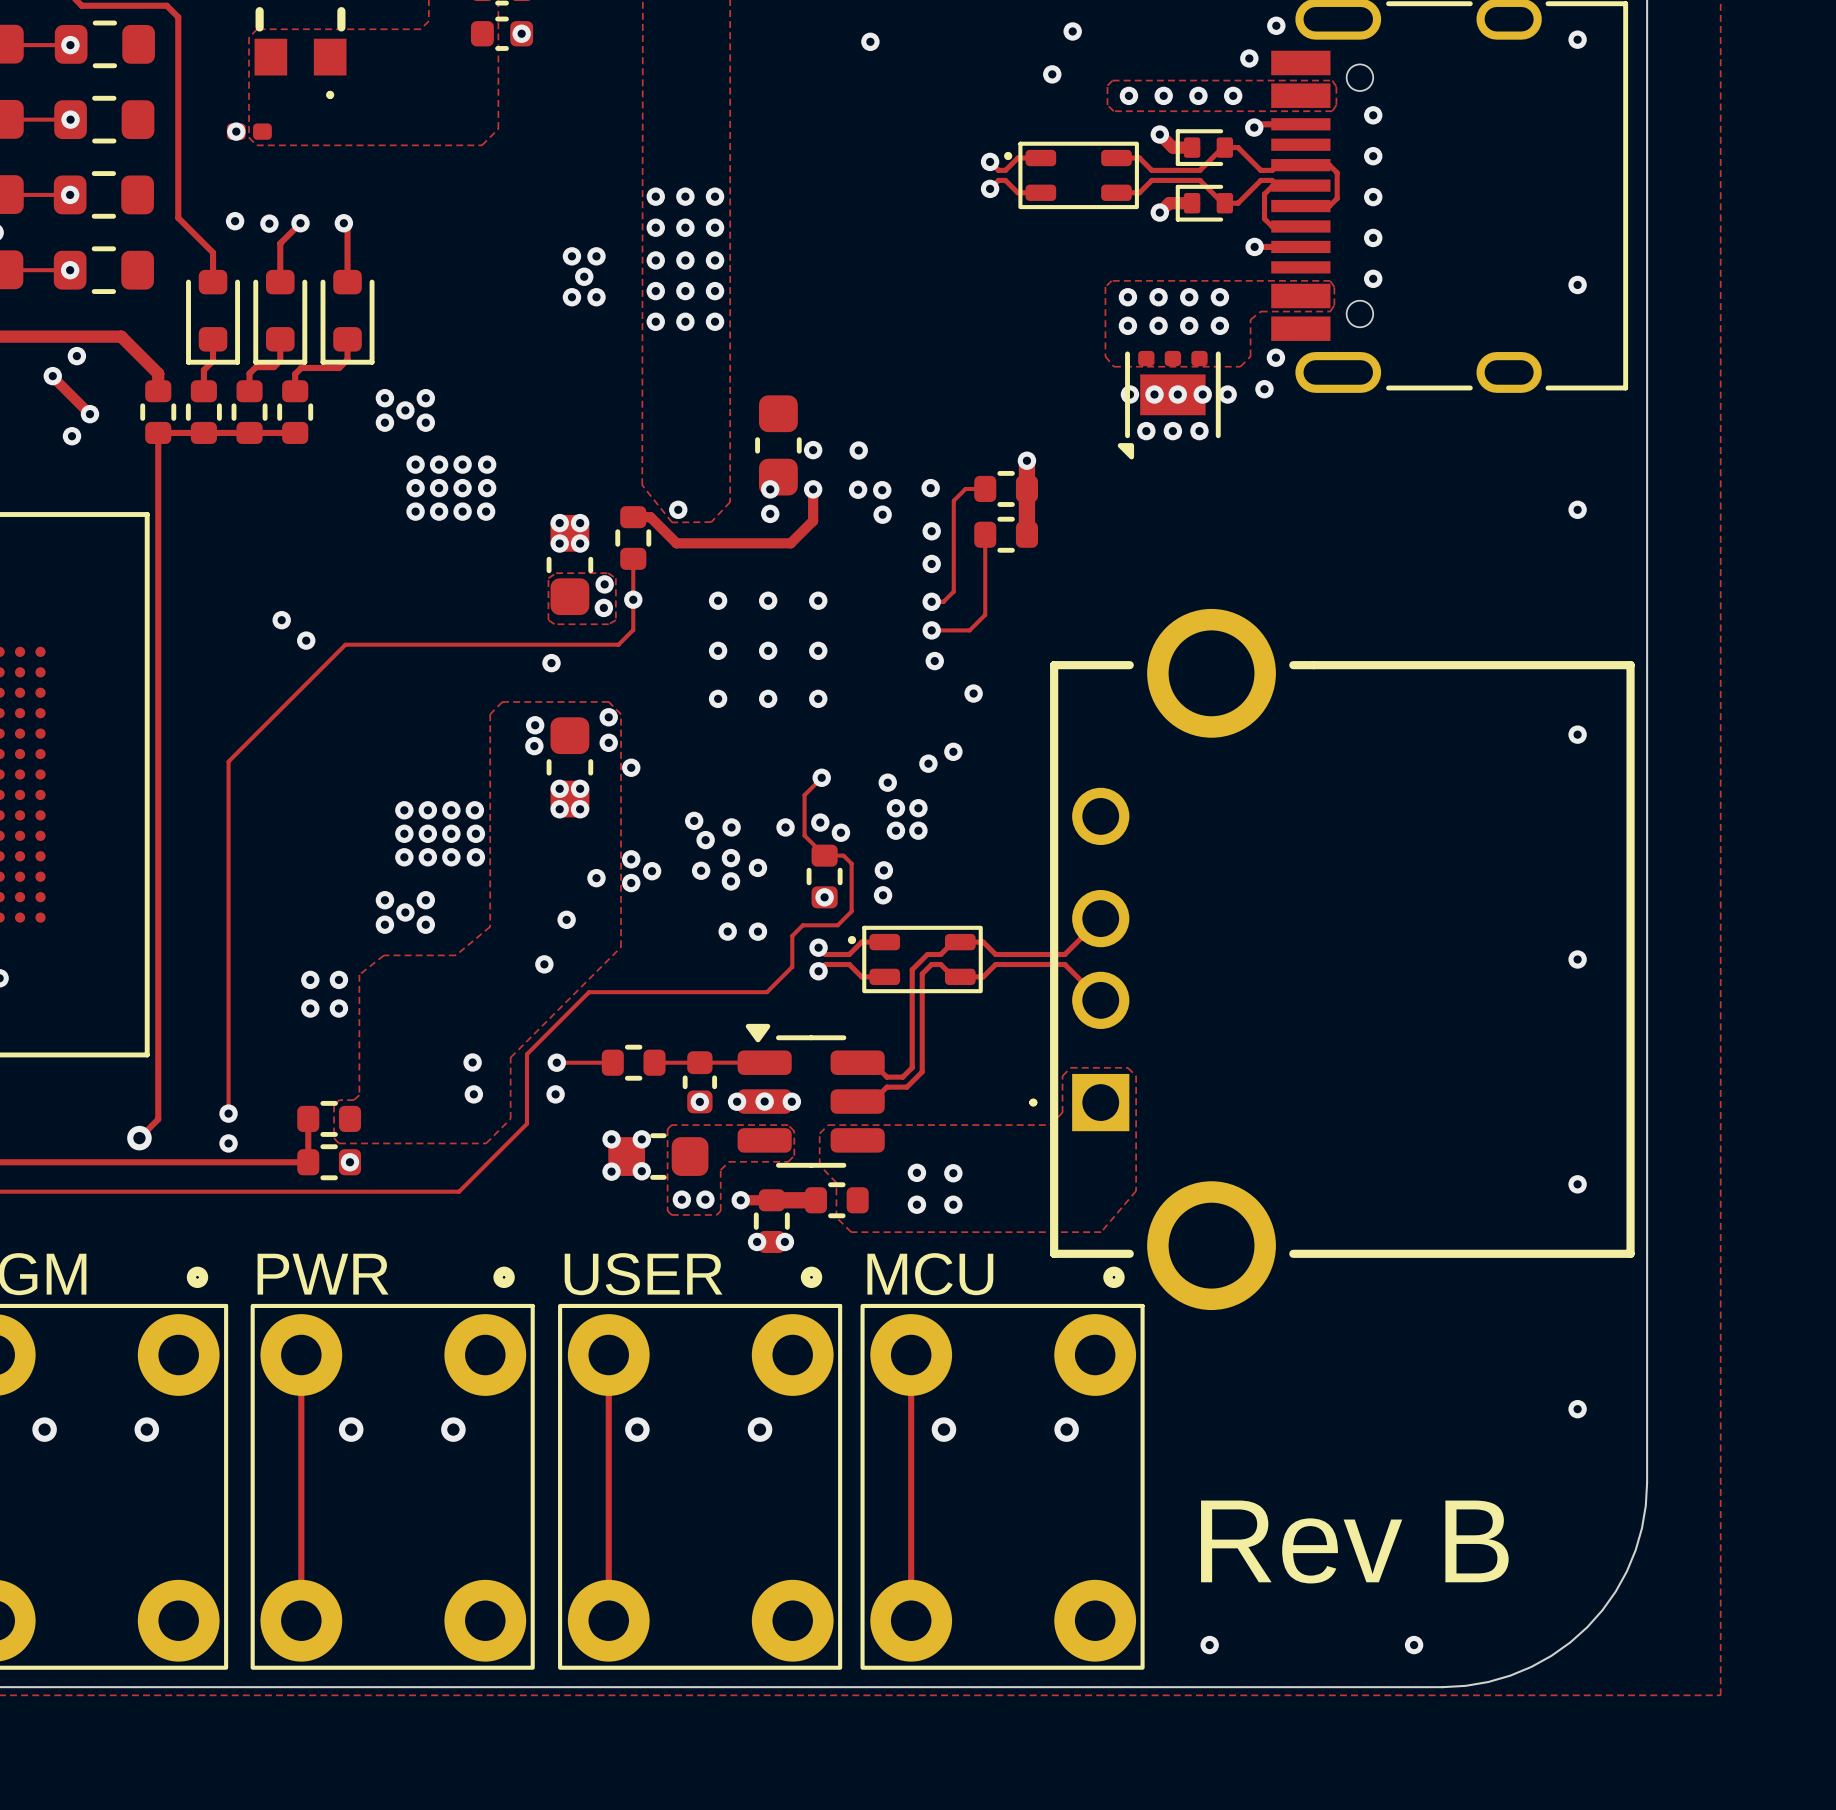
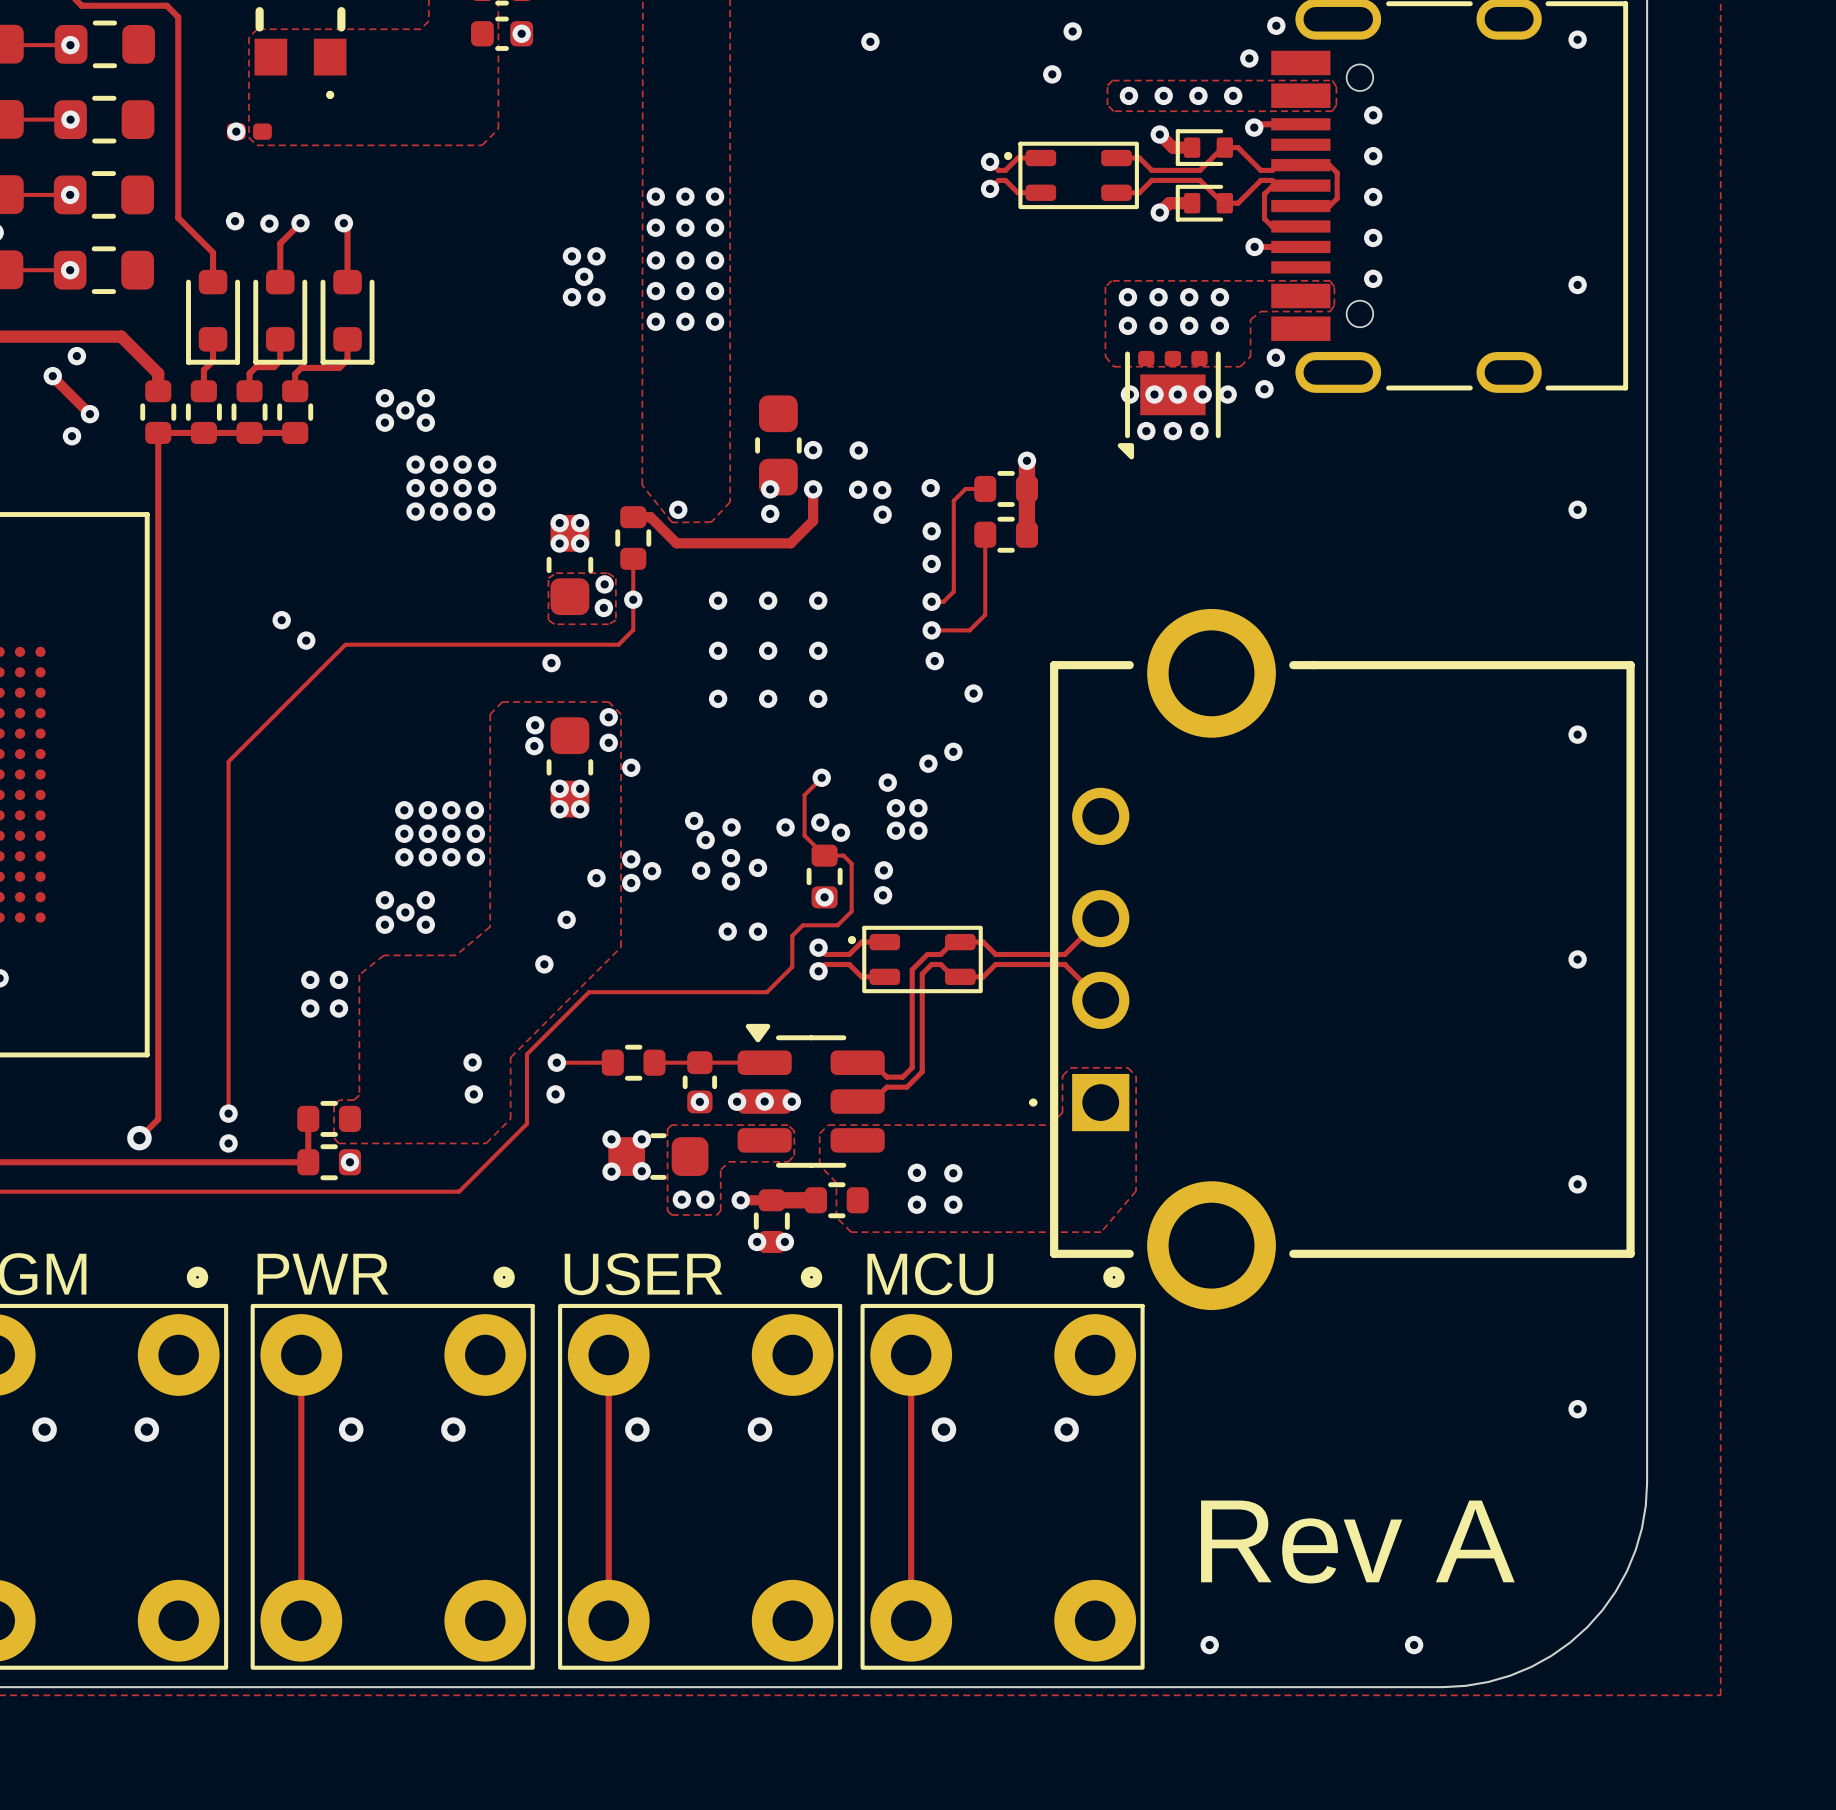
text: Rev B (1354, 1542) -> Rev A (1357, 1542)

